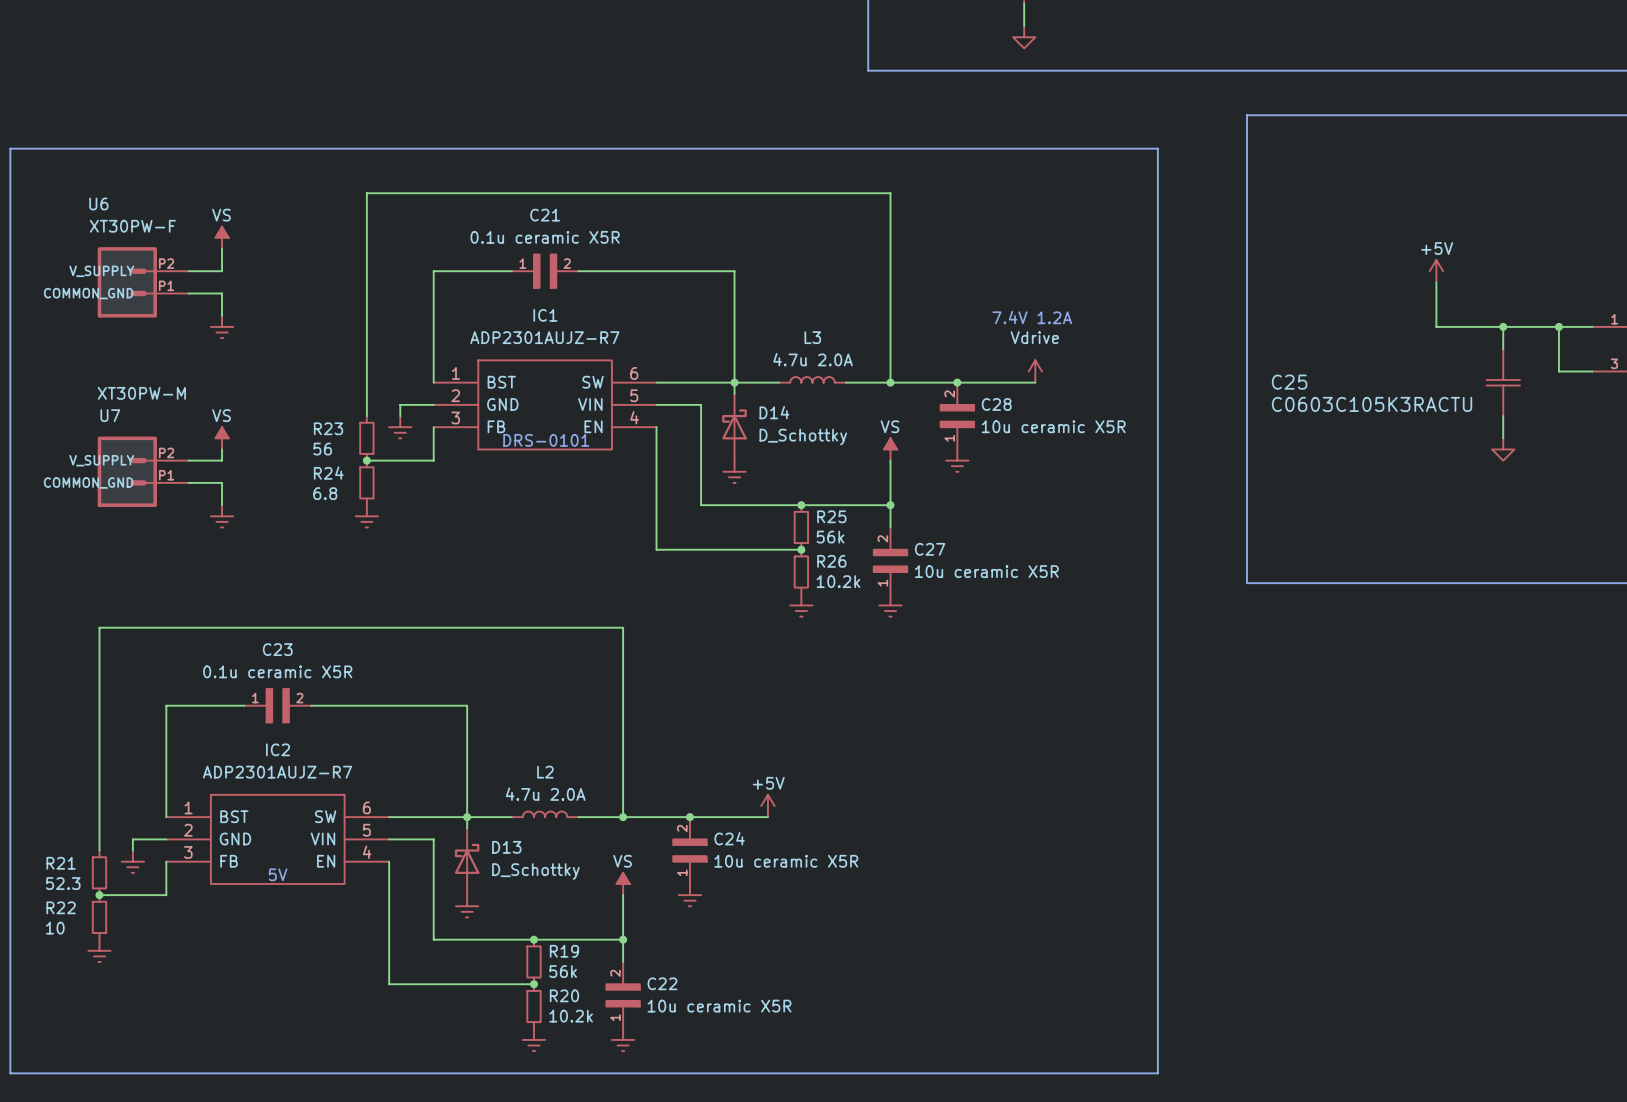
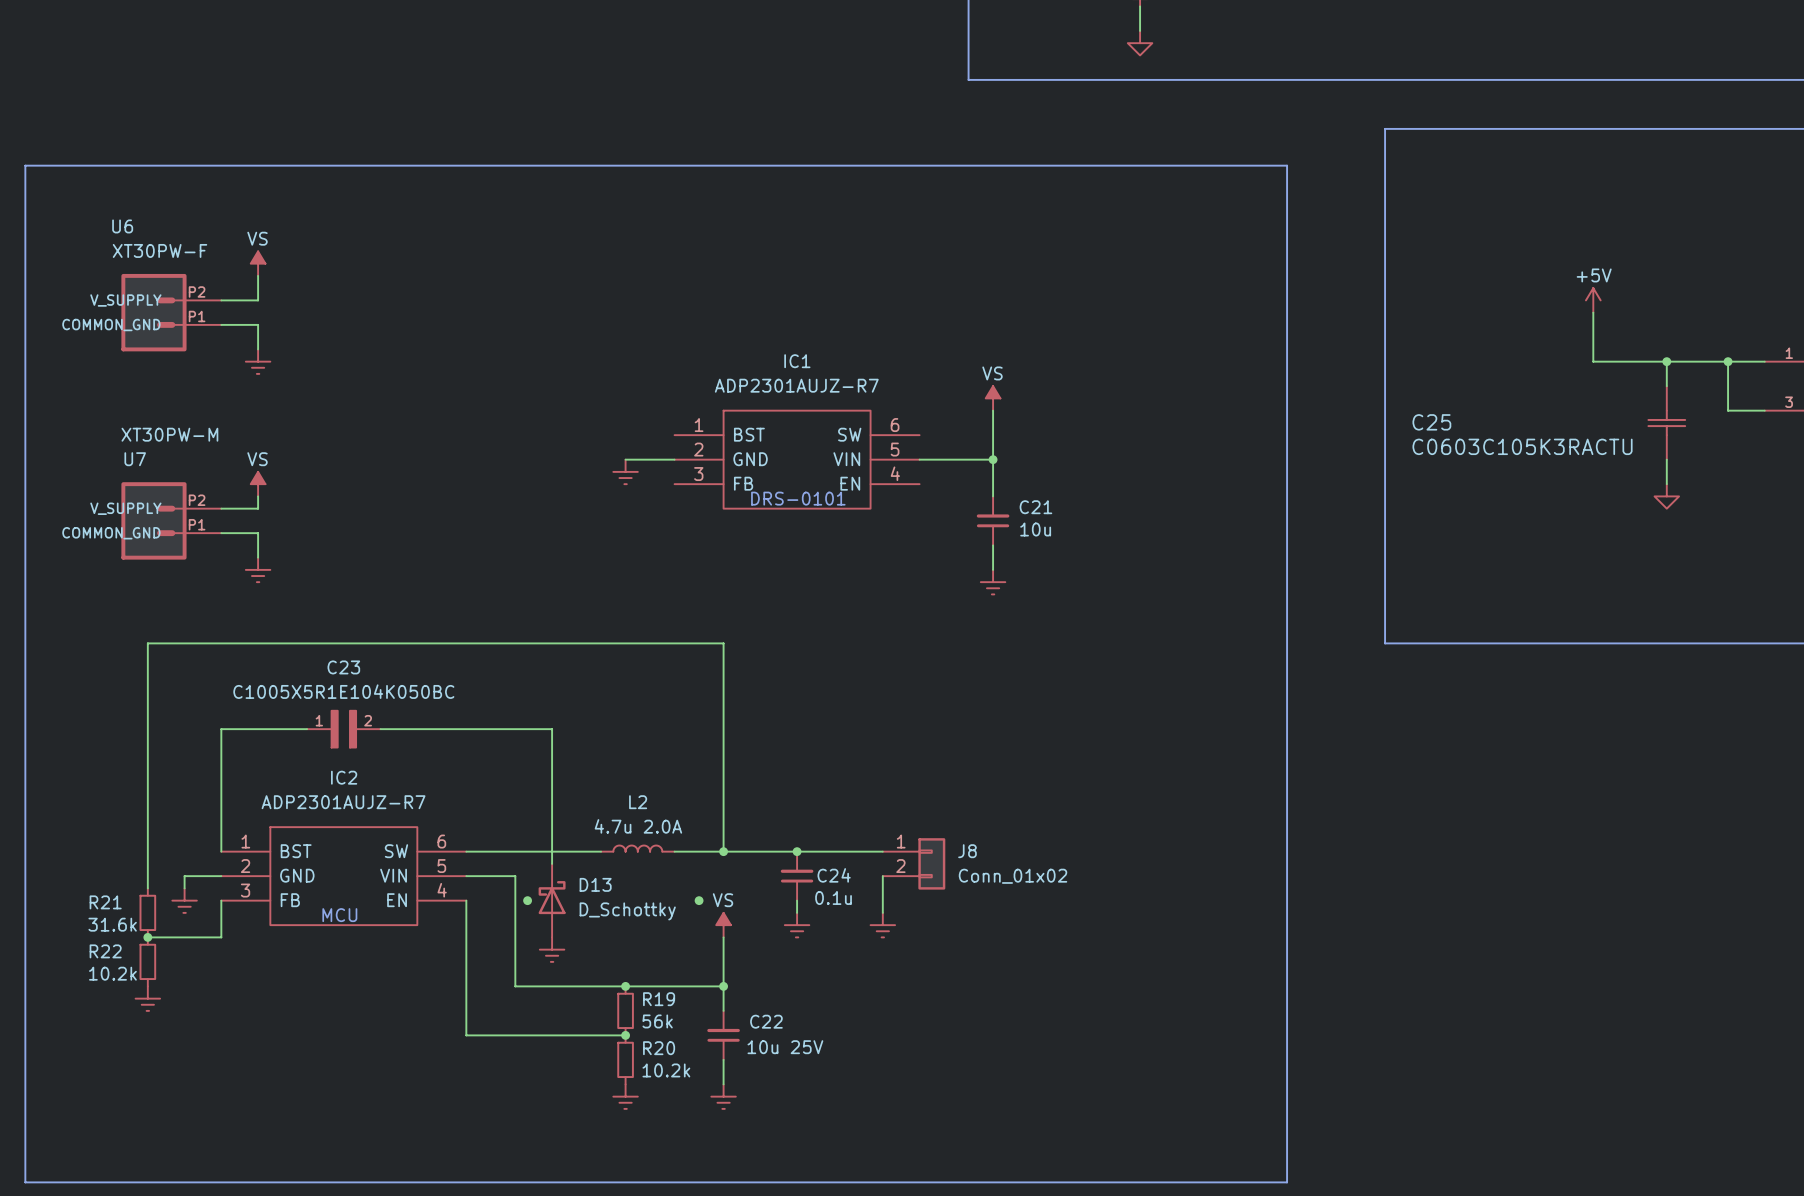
C21 name position: C21 (545, 215) -> C21 (1035, 507)
C21 value: 0.1u ceramic X5R (545, 237) -> 10u (1035, 529)
C21 symbol: [511, 254, 579, 288] -> [976, 496, 1010, 546]
wire: (511, 271) (433, 271) (433, 382) -> none
wire: (578, 271) (734, 271) (734, 393) -> none
text: 7.4V 1.2A (1032, 317) -> none
wire: (890, 371) (890, 193) (366, 193) (366, 416) -> none
power symbol: Vdrive (1035, 371) -> none
L3: 4.7u 2.0A (812, 379) -> none
wire: (656, 382) (779, 382) -> none
junction: (734, 382) -> none
wire: (845, 382) (1035, 382) -> none
wire: none -> (993, 422) (993, 496)
junction position: (890, 382) -> (993, 459)
junction: (957, 382) -> none
wire: (433, 404) (400, 404) (400, 416) -> none
IC1 position: (545, 404) -> (797, 459)
wire: (656, 404) (701, 404) (701, 505) (890, 505) -> none
wire: none -> (625, 459) (674, 459)
wire: none -> (919, 459) (993, 459)
C28: 10u ceramic X5R (957, 416) -> none
power symbol: (400, 427) -> none
wire: (433, 427) (433, 460) (366, 460) -> none
power symbol: none -> (625, 471)
wire: (656, 427) (656, 549) (801, 549) -> none
D14: D_Schottky (734, 427) -> none
R23: 56 (366, 438) -> none
text position: DRS-0101 (546, 440) -> DRS-0101 (798, 498)
power symbol position: VS (890, 449) -> VS (993, 398)
junction: (366, 460) -> none
power symbol: (957, 460) -> none
power symbol: (734, 471) -> none
R24: 6.8 (366, 482) -> none
junction: (801, 505) -> none
junction: (890, 505) -> none
power symbol: (366, 516) -> none
R25: 56k (801, 527) -> none
power symbol: none -> (993, 582)
junction: (801, 549) -> none
C27: 10u ceramic X5R (890, 560) -> none
R26: 10.2k (801, 572) -> none
power symbol: (801, 605) -> none
power symbol: (890, 605) -> none
C23 value: 0.1u ceramic X5R (277, 671) -> C1005X5R1E104K050BC (343, 691)
wire: (244, 705) (166, 705) (166, 817) -> (307, 729) (221, 729) (221, 851)
C23 position: (277, 705) -> (343, 729)
wire: (311, 705) (467, 705) (467, 828) -> (380, 729) (552, 729) (552, 863)
junction: none -> (723, 851)
junction: none -> (797, 851)
J8: none -> Conn_01x02 (914, 863)
wire: none -> (466, 876) (515, 876) (515, 986) (723, 986)
wire: none -> (882, 876) (882, 912)
power symbol: +5V (767, 805) -> none
L2 position: (545, 814) -> (637, 848)
power symbol: none -> (184, 900)
wire: (389, 817) (511, 817) -> (466, 851) (601, 851)
wire: (578, 817) (767, 817) -> (674, 851) (882, 851)
wire: (623, 817) (623, 627) (99, 627) (99, 850) -> (723, 851) (723, 643) (147, 643) (147, 888)
C24 symbol: [673, 817, 707, 884] -> [780, 851, 814, 901]
junction: (689, 817) -> none
wire: none -> (797, 900) (797, 912)
text: none -> MCU (339, 915)
wire: (166, 839) (132, 839) (132, 850) -> (221, 876) (184, 876) (184, 888)
IC2 position: (277, 839) -> (343, 876)
wire: (389, 839) (433, 839) (433, 939) -> (466, 900) (466, 1035) (490, 1035)
power symbol: none -> (797, 925)
power symbol: none -> (882, 925)
power symbol: (132, 861) -> none
wire: (166, 861) (166, 895) (99, 895) -> (221, 900) (221, 937) (147, 937)
wire: (389, 861) (389, 984) (533, 984) -> none
D13 position: (467, 861) -> (552, 900)
C24 value: 10u ceramic X5R (786, 861) -> 0.1u (833, 897)
R21 position: (99, 872) -> (147, 912)
text: 5V (278, 874) -> none
R21 value: 52.3 (63, 883) -> 31.6k (112, 924)
power symbol position: VS (623, 883) -> VS (723, 925)
junction position: (99, 895) -> (147, 937)
junction: none -> (625, 986)
wire: (623, 895) (623, 961) -> (723, 937) (723, 1010)
junction: none -> (723, 986)
power symbol: (689, 895) -> none
power symbol: none -> (147, 998)
power symbol position: (467, 906) -> (552, 949)
R22 position: (99, 917) -> (147, 961)
R22 value: 10 (55, 928) -> 10.2k (112, 973)
junction position: (533, 939) -> (625, 1035)
wire: (556, 939) (623, 939) -> none
junction: (623, 939) -> none
power symbol: (99, 950) -> none
R19 position: (533, 961) -> (625, 1010)
C22 symbol: [606, 961, 640, 1029] -> [707, 1010, 740, 1060]
wire: none -> (723, 1059) (723, 1084)
junction: (533, 984) -> none
power symbol: none -> (625, 1096)
power symbol: none -> (723, 1096)
R20 position: (533, 1006) -> (625, 1059)
C22 value: 10u ceramic X5R (719, 1006) -> 10u 25V (785, 1047)
power symbol: (533, 1039) -> none
power symbol: (623, 1039) -> none

